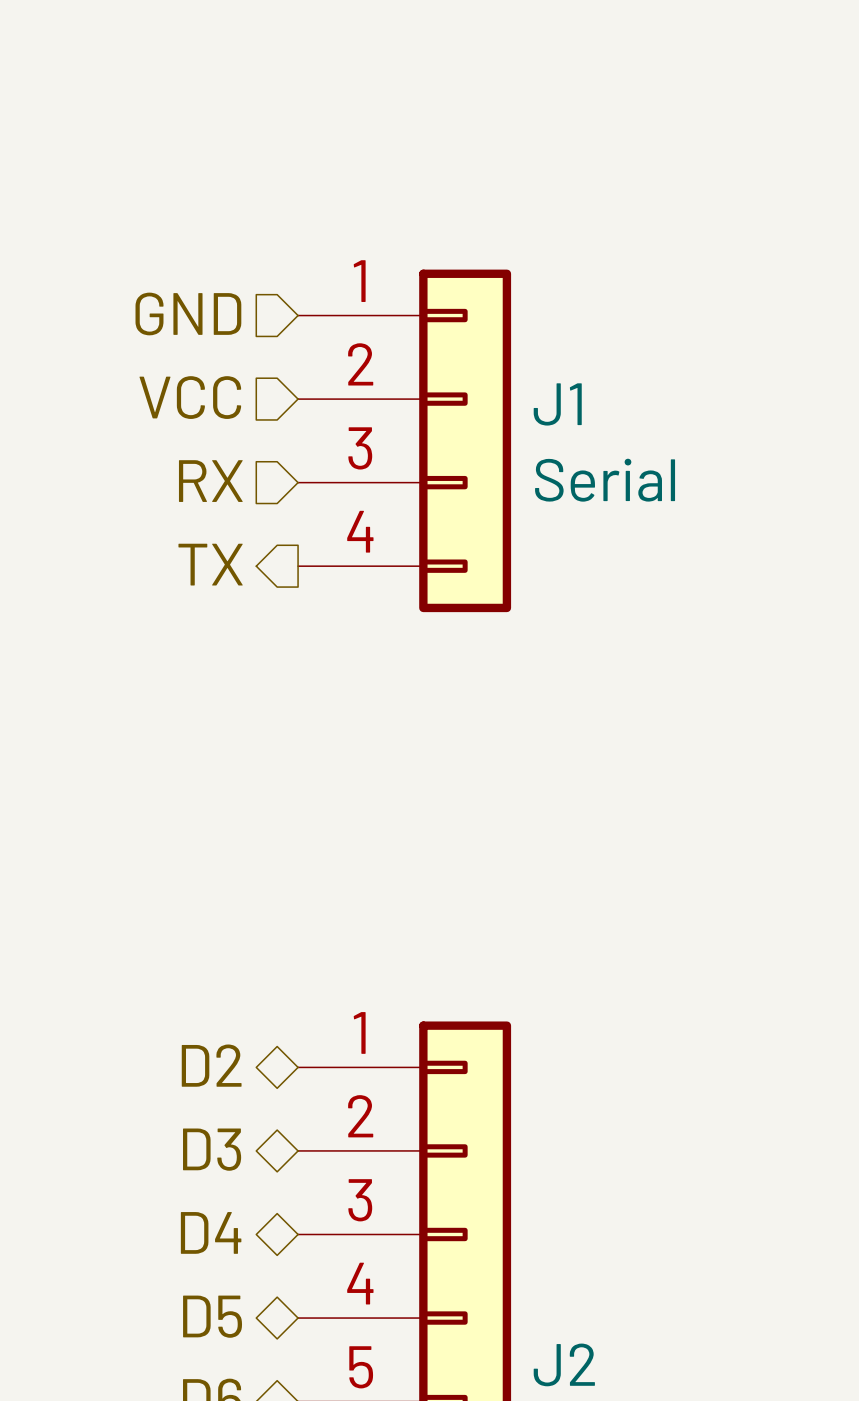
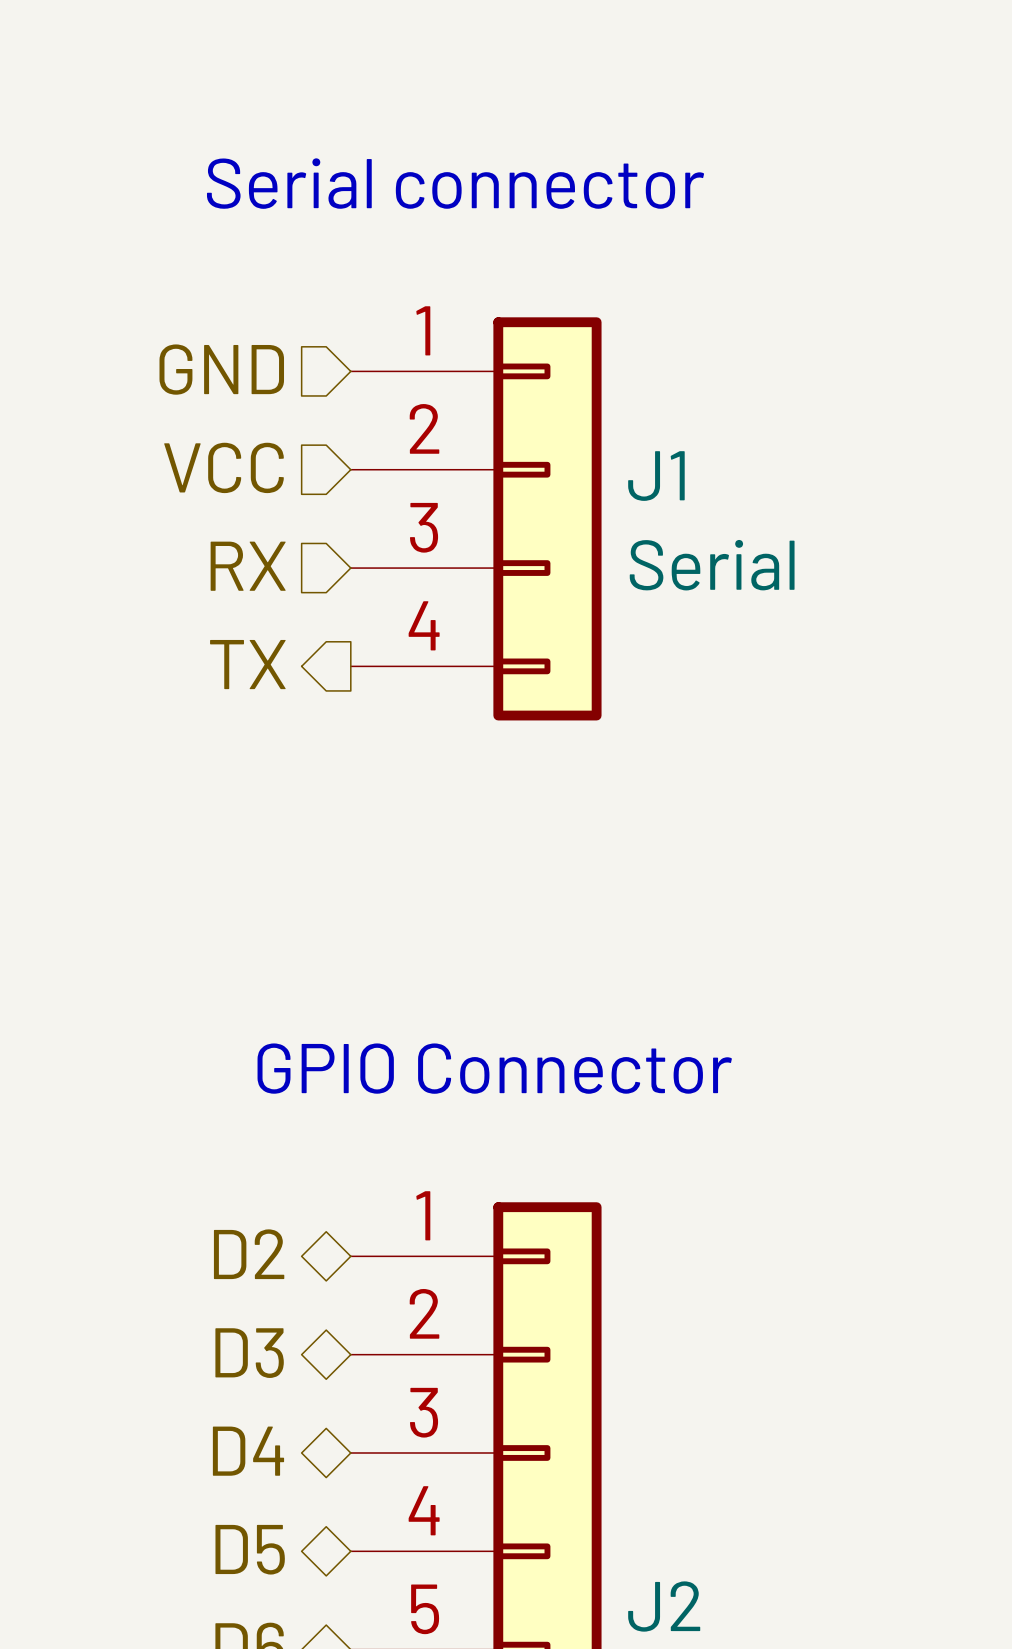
text: none -> Serial connector (455, 183)
text: none -> GPIO Connector (494, 1068)

